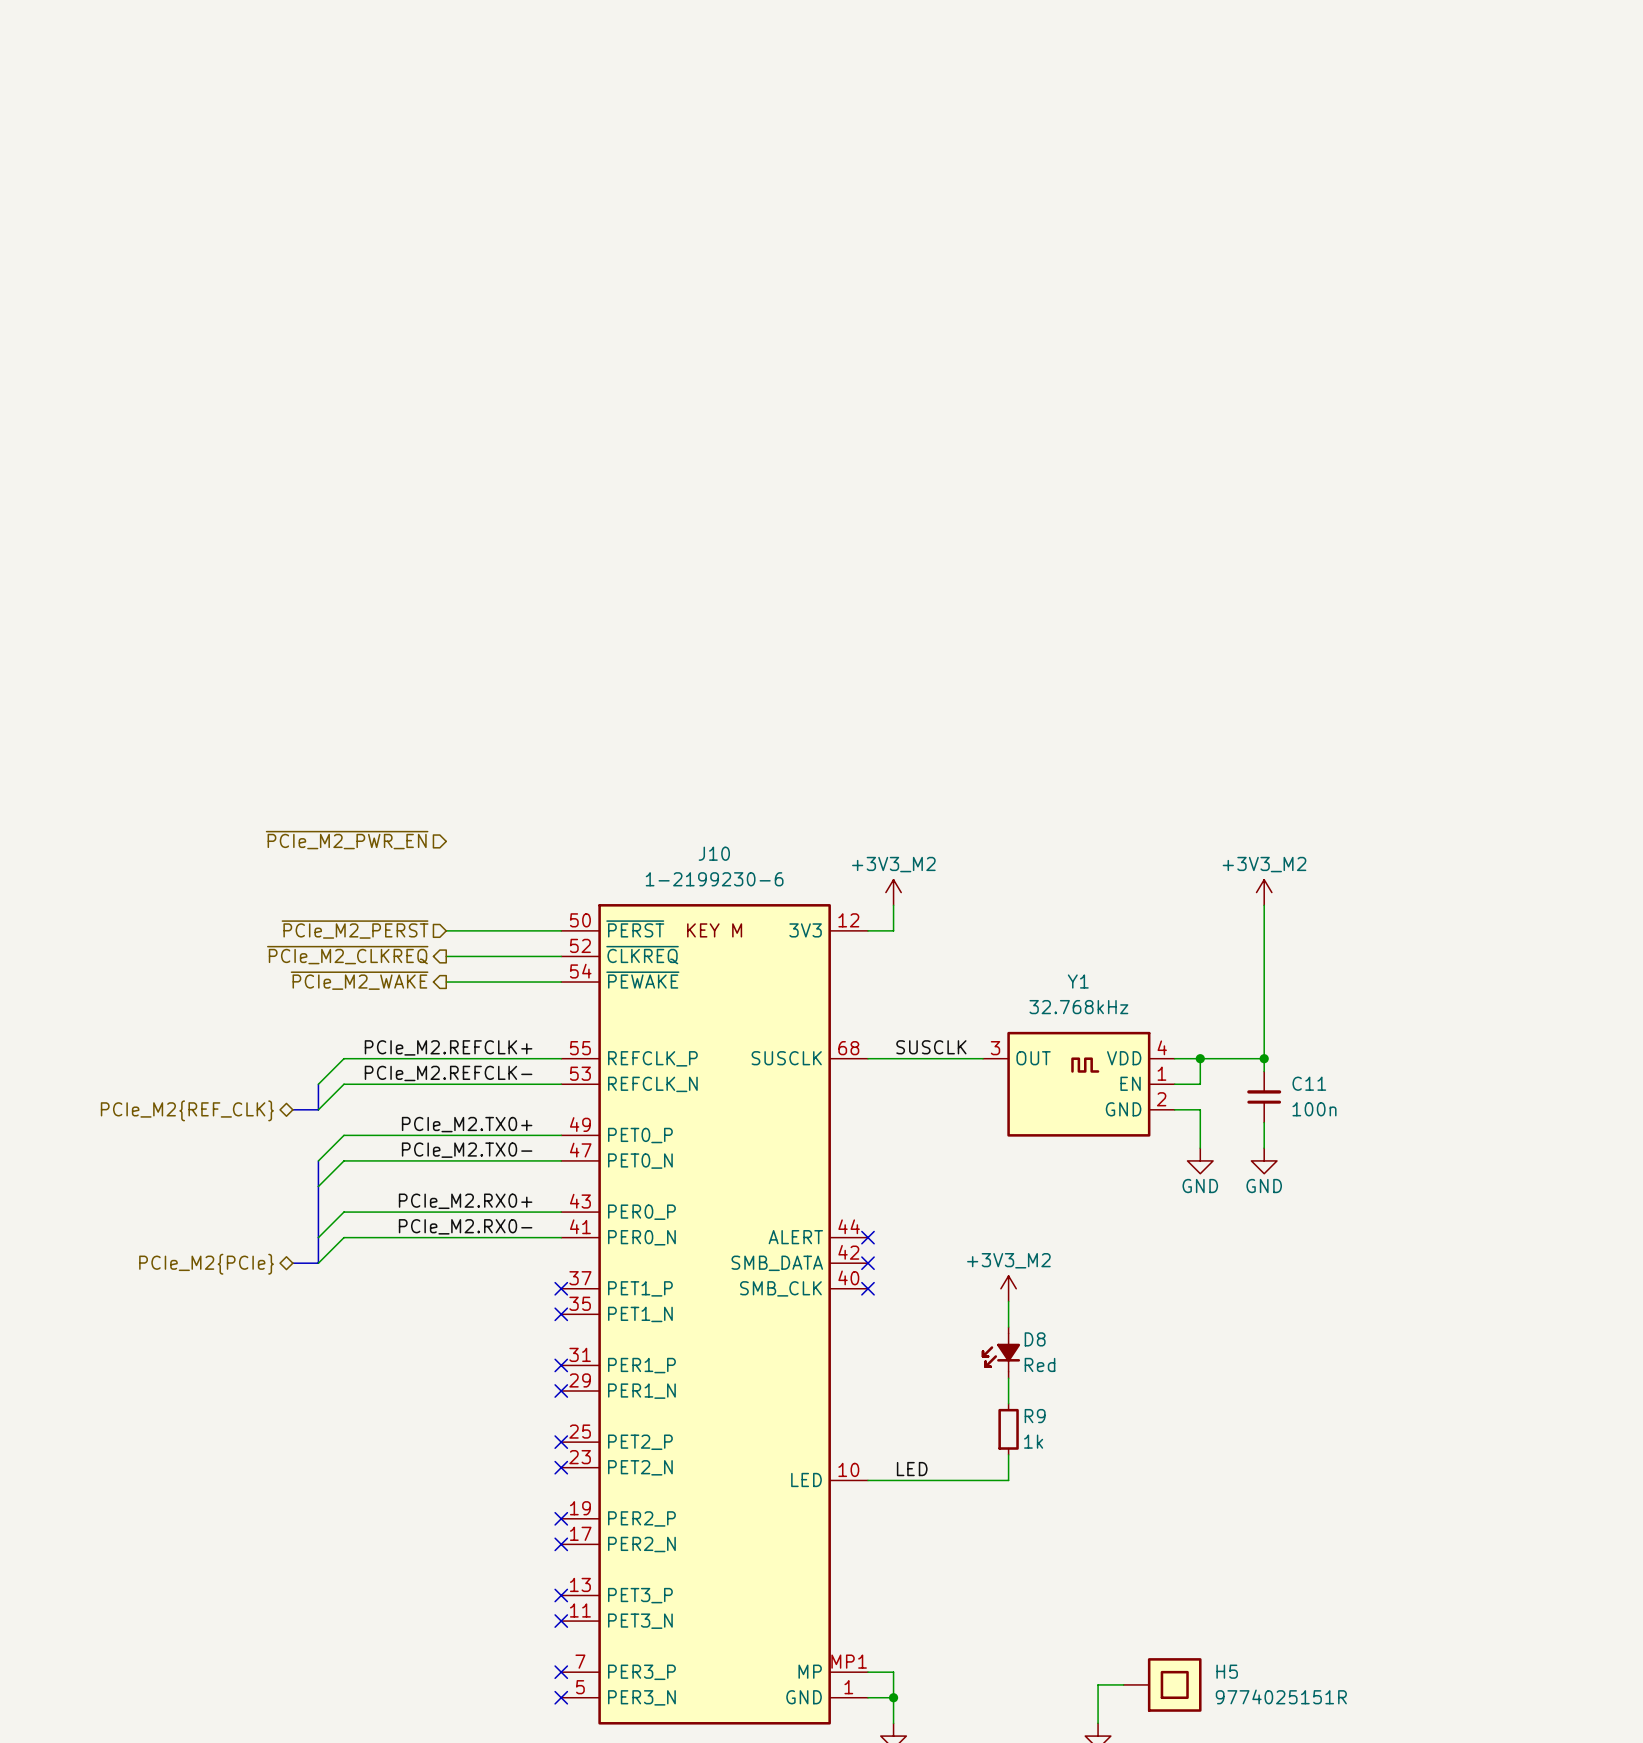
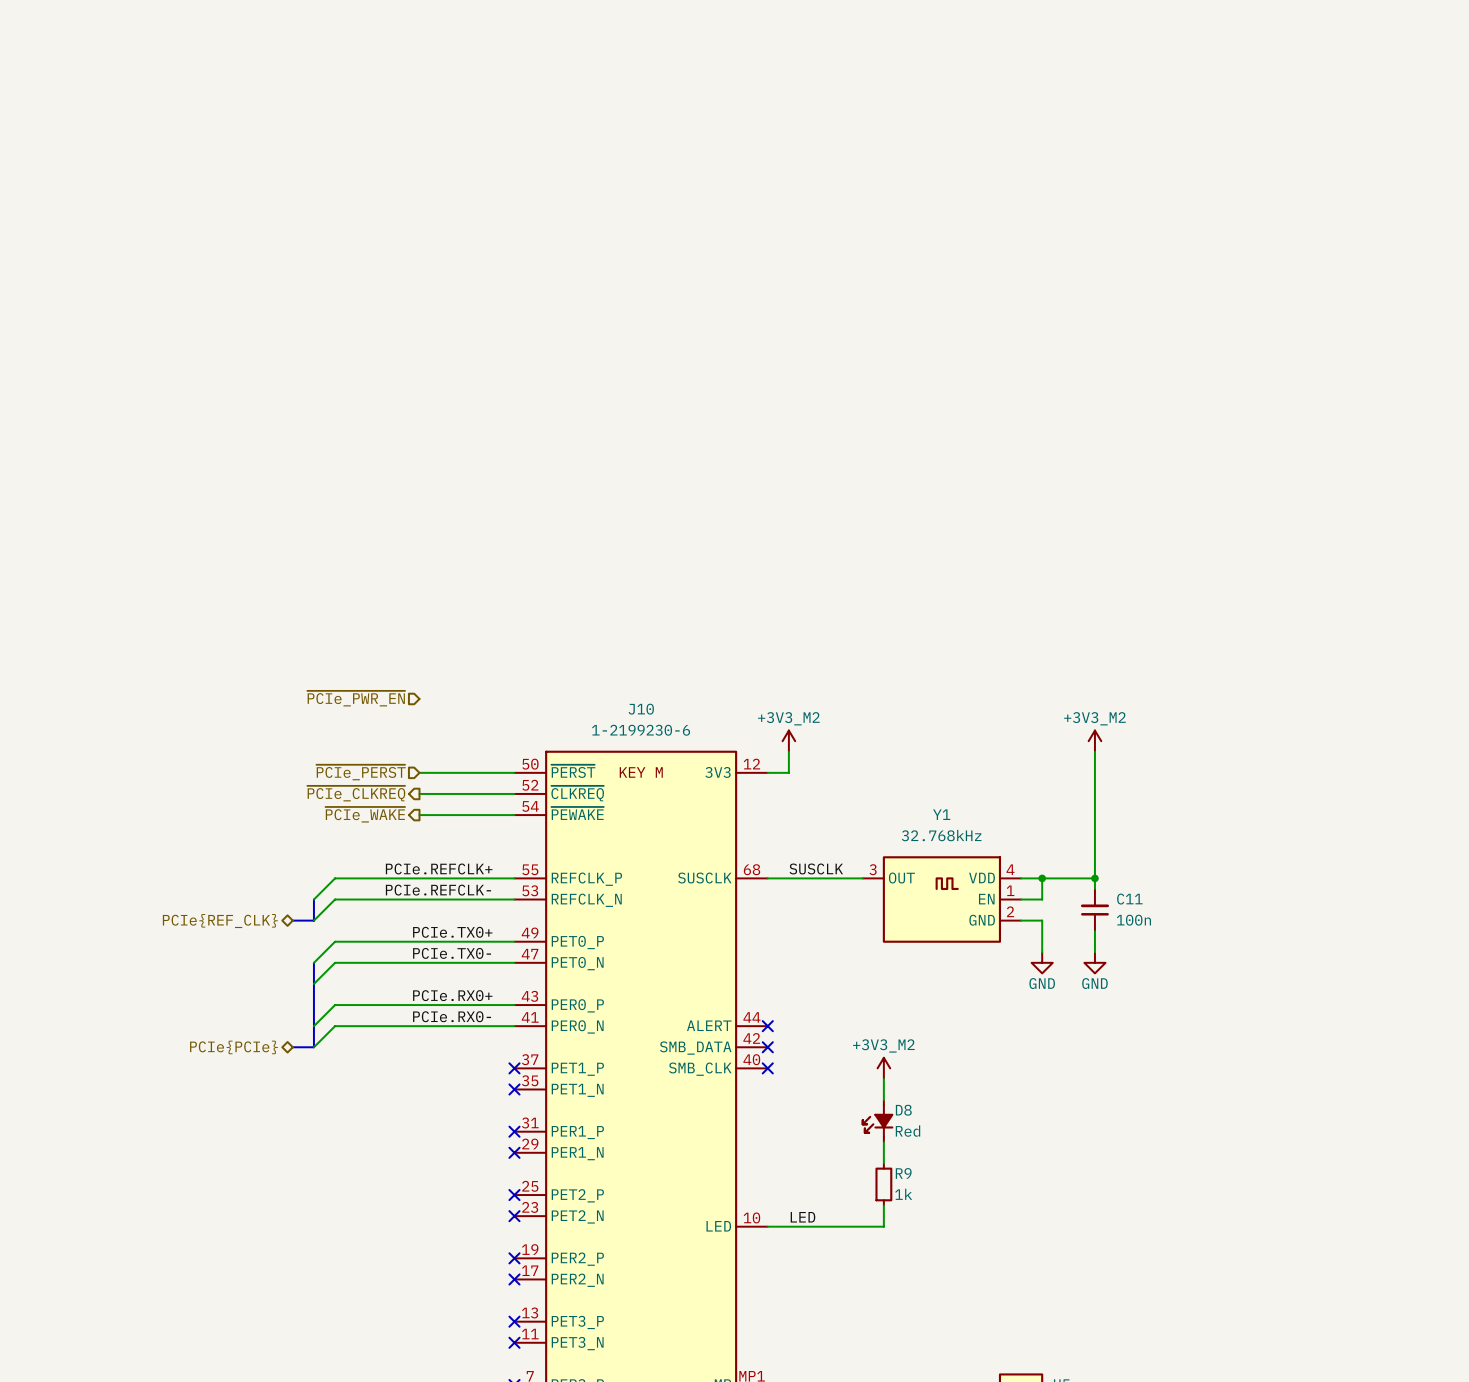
hierarchical label: ~{PCIe_M2_PWR_EN} (347, 840) -> ~{PCIe_PWR_EN} (356, 698)
hierarchical label: ~{PCIe_M2_PERST} (355, 929) -> ~{PCIe_PERST} (361, 772)
hierarchical label: ~{PCIe_M2_CLKREQ} (347, 955) -> ~{PCIe_CLKREQ} (356, 793)
hierarchical label: ~{PCIe_M2_WAKE} (359, 980) -> ~{PCIe_WAKE} (365, 814)
label: PCIe_M2.REFCLK+ (448, 1047) -> PCIe.REFCLK+ (439, 868)
label: PCIe_M2.REFCLK- (448, 1073) -> PCIe.REFCLK- (438, 890)
hierarchical label: PCIe_M2{REF_CLK} (187, 1110) -> PCIe{REF_CLK} (220, 921)
label: PCIe_M2.TX0+ (467, 1124) -> PCIe.TX0+ (452, 932)
label: PCIe_M2.TX0- (467, 1150) -> PCIe.TX0- (452, 953)
label: PCIe_M2.RX0+ (465, 1201) -> PCIe.RX0+ (452, 995)
label: PCIe_M2.RX0- (465, 1226) -> PCIe.RX0- (452, 1016)
hierarchical label: PCIe_M2{PCIe} (206, 1264) -> PCIe{PCIe} (233, 1047)

